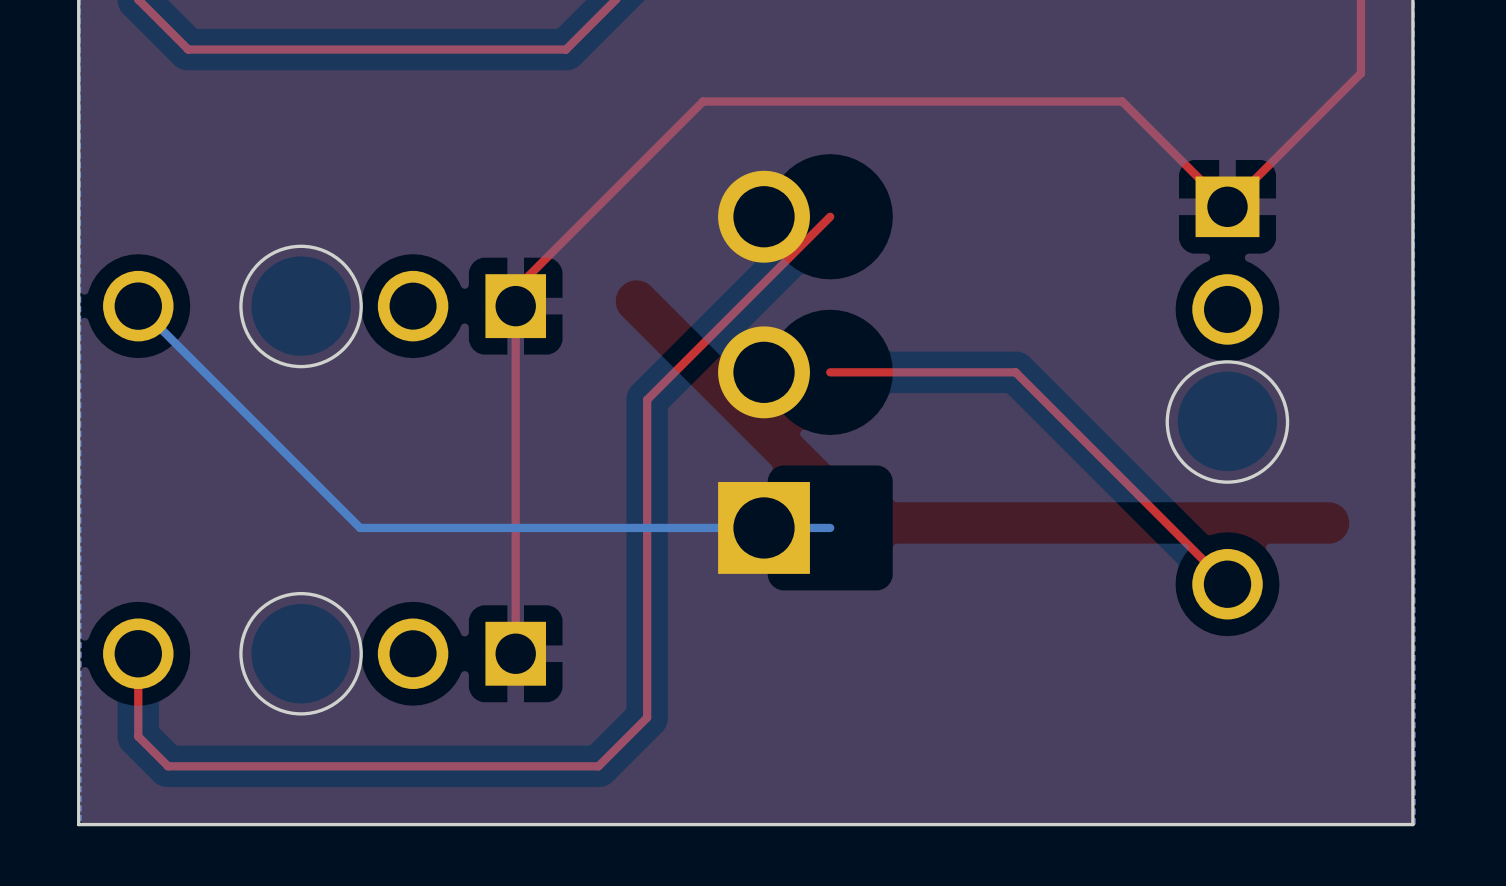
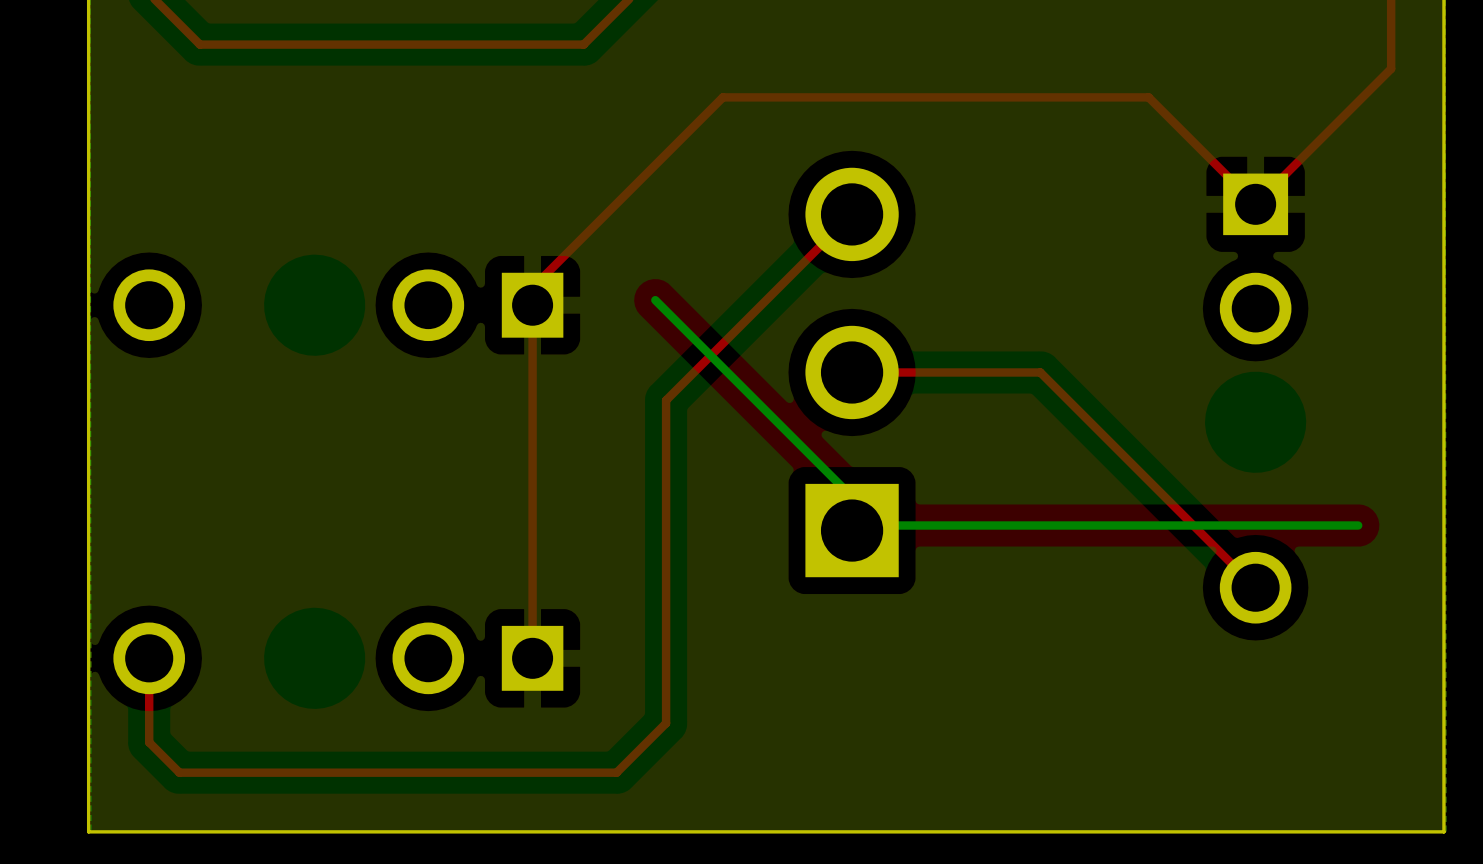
round board edge: [239, 244, 363, 369] -> none
bottom track: (138, 306) (360, 527) (830, 527) -> (655, 300) (880, 525) (1358, 525)
round board edge: [1165, 360, 1290, 484] -> none
part position: (764, 372) -> (852, 372)
round board edge: [239, 591, 363, 716] -> none

